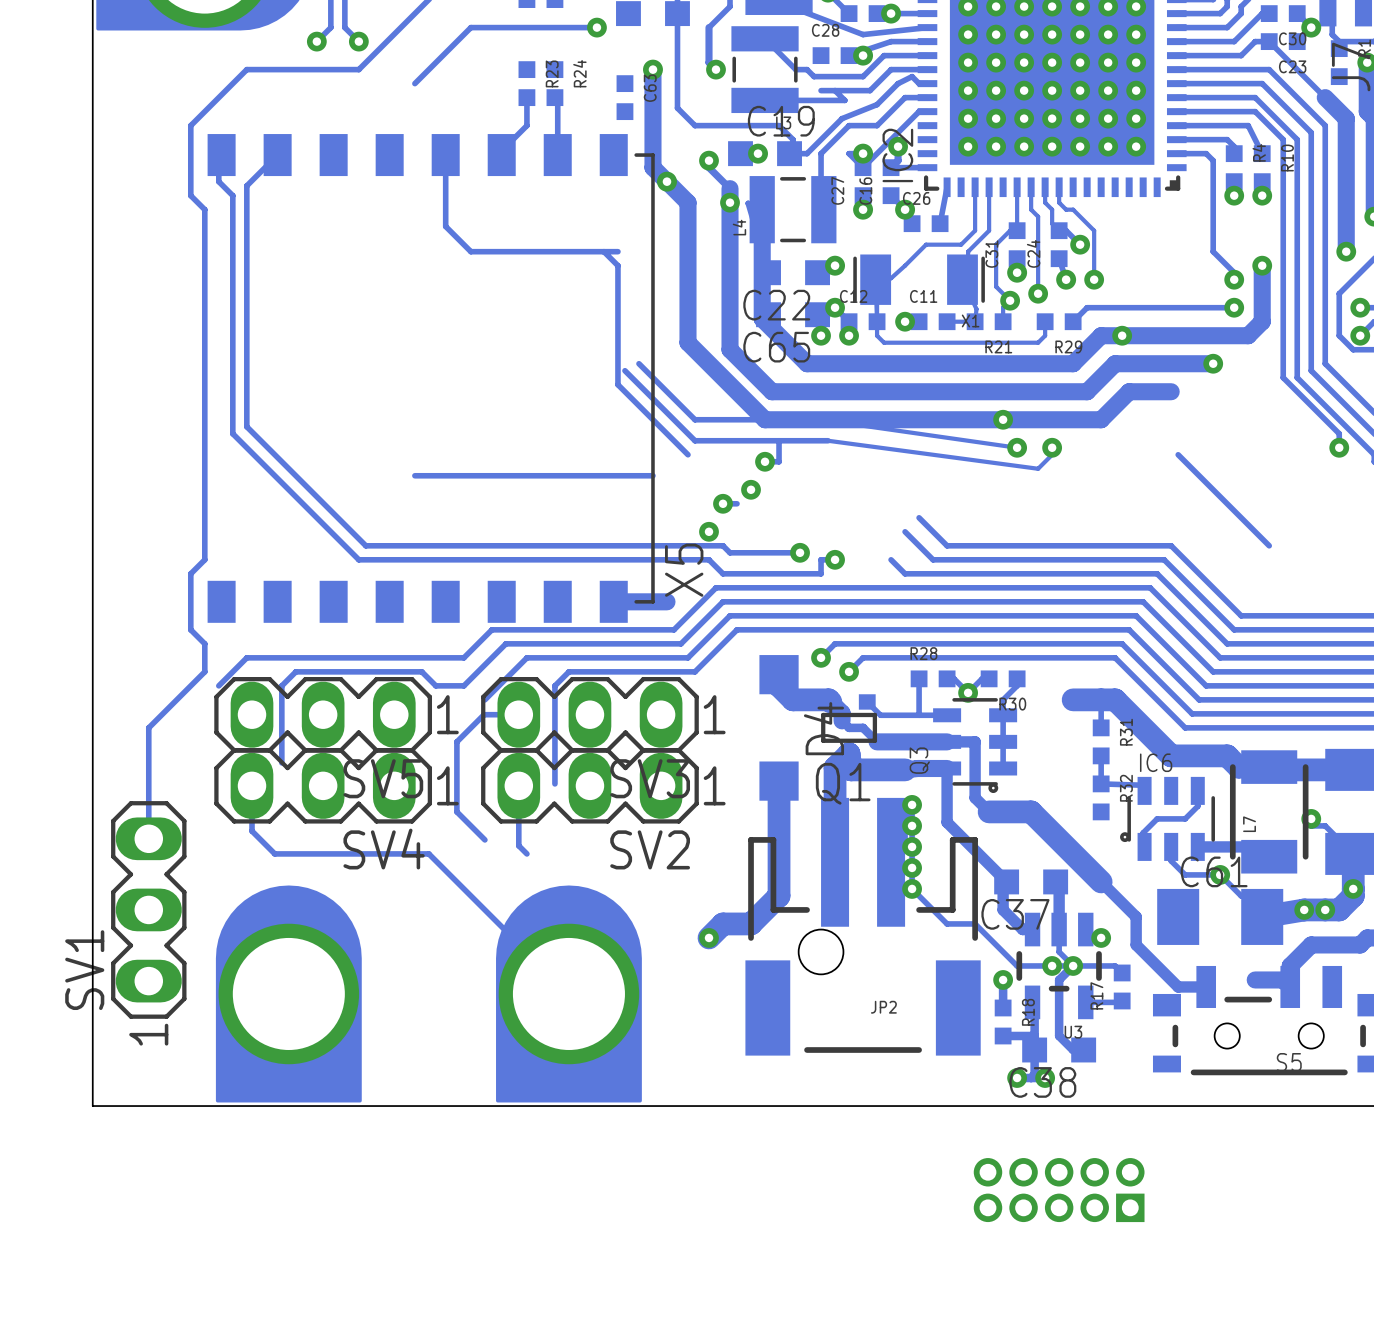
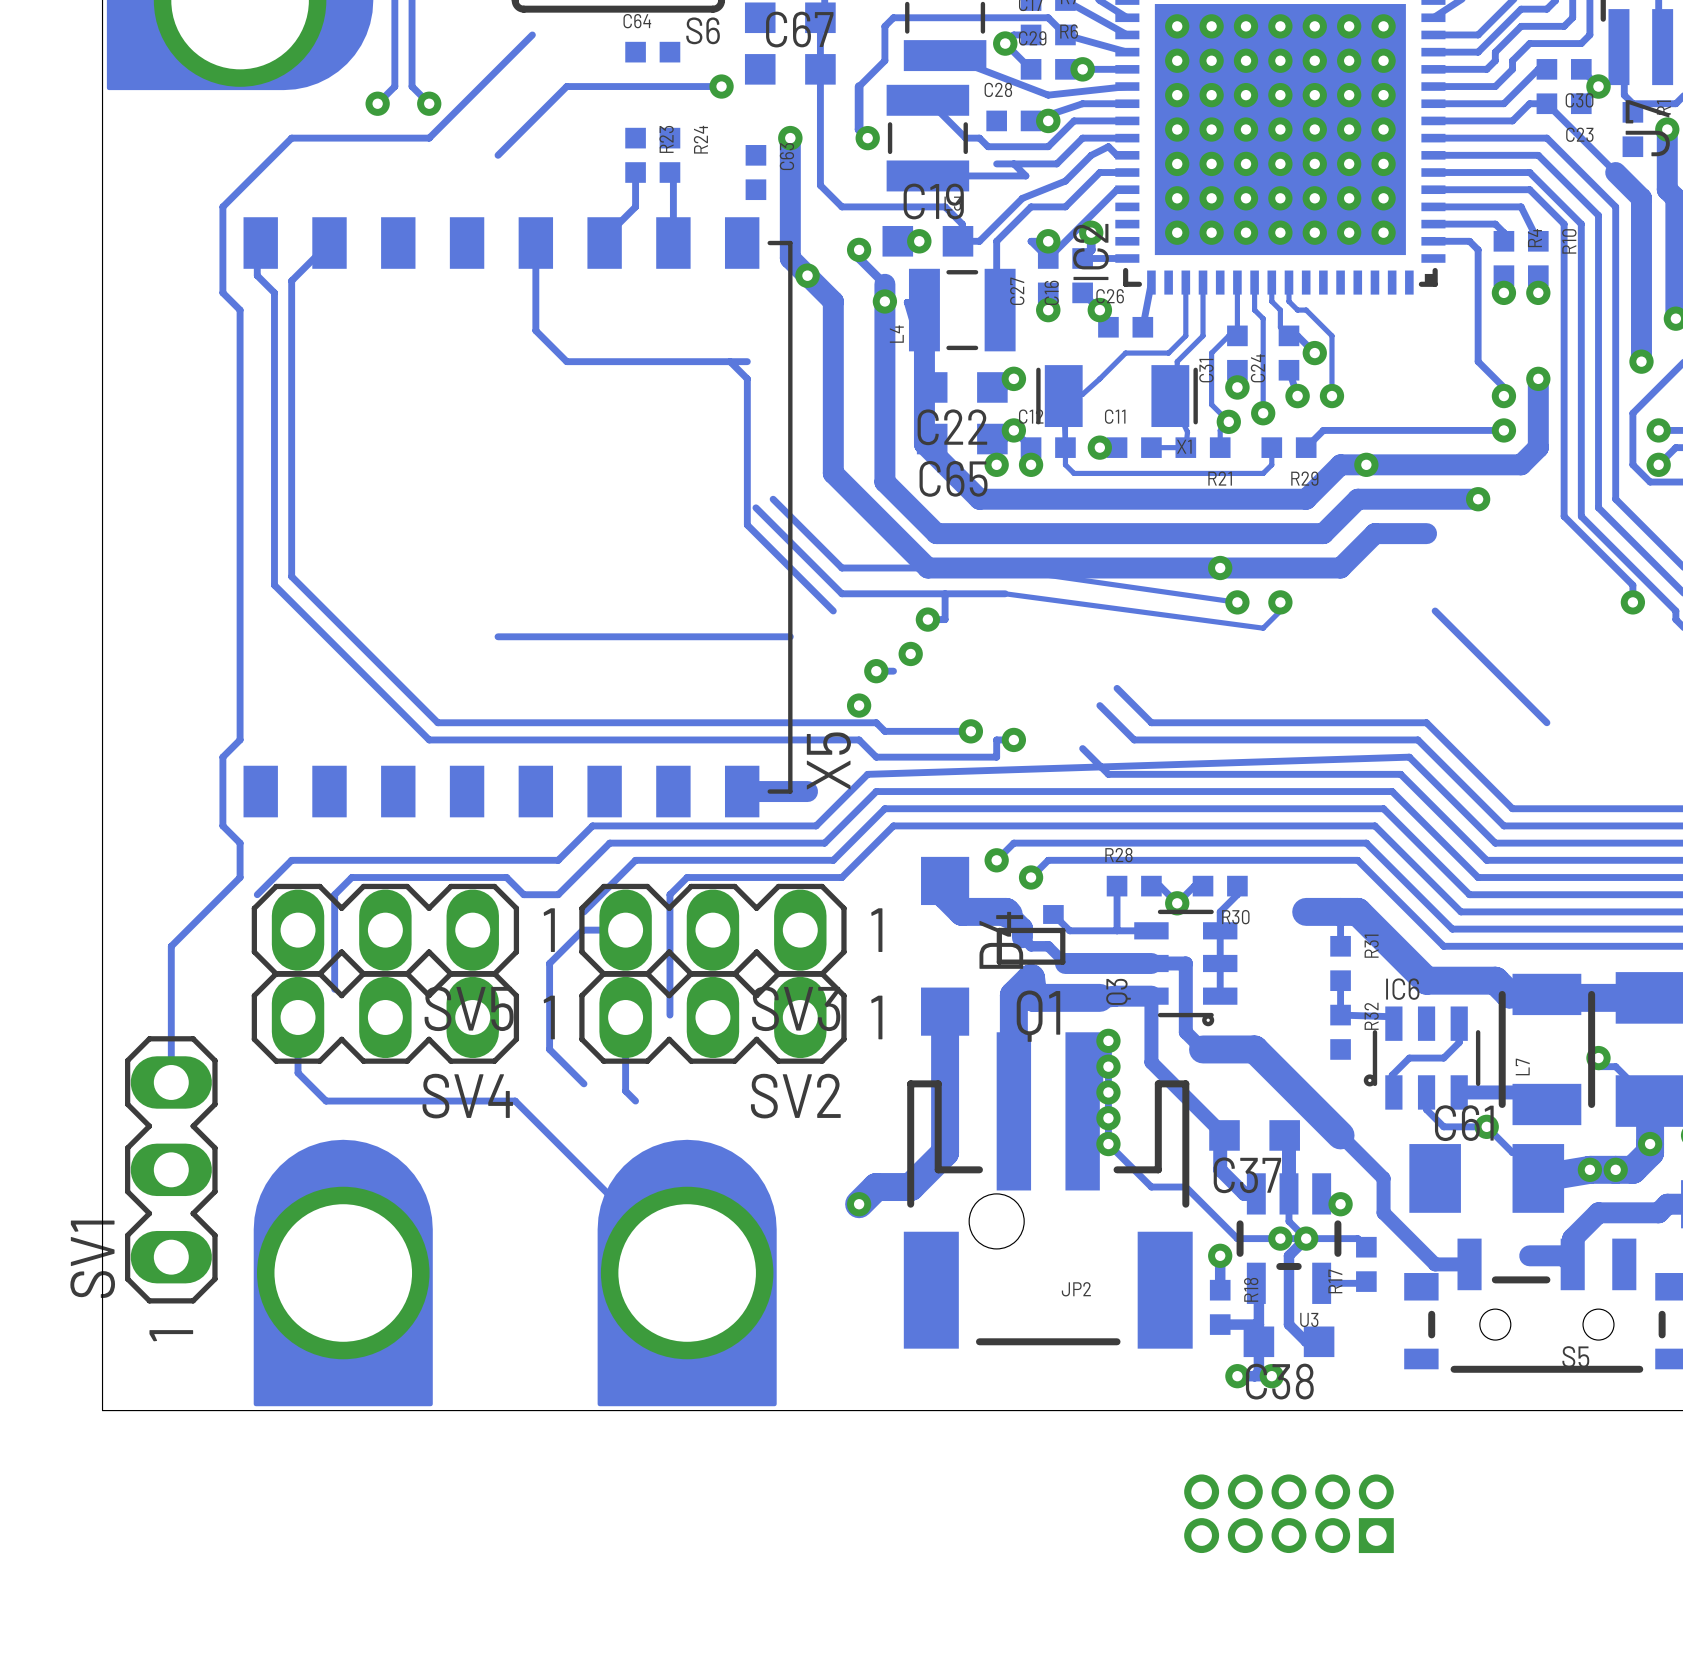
track: (891, 559) (905, 573) (1157, 573) -> (867, 774) (1409, 757)
track: (912, 587) (716, 587) -> (1108, 774) (1082, 748)

